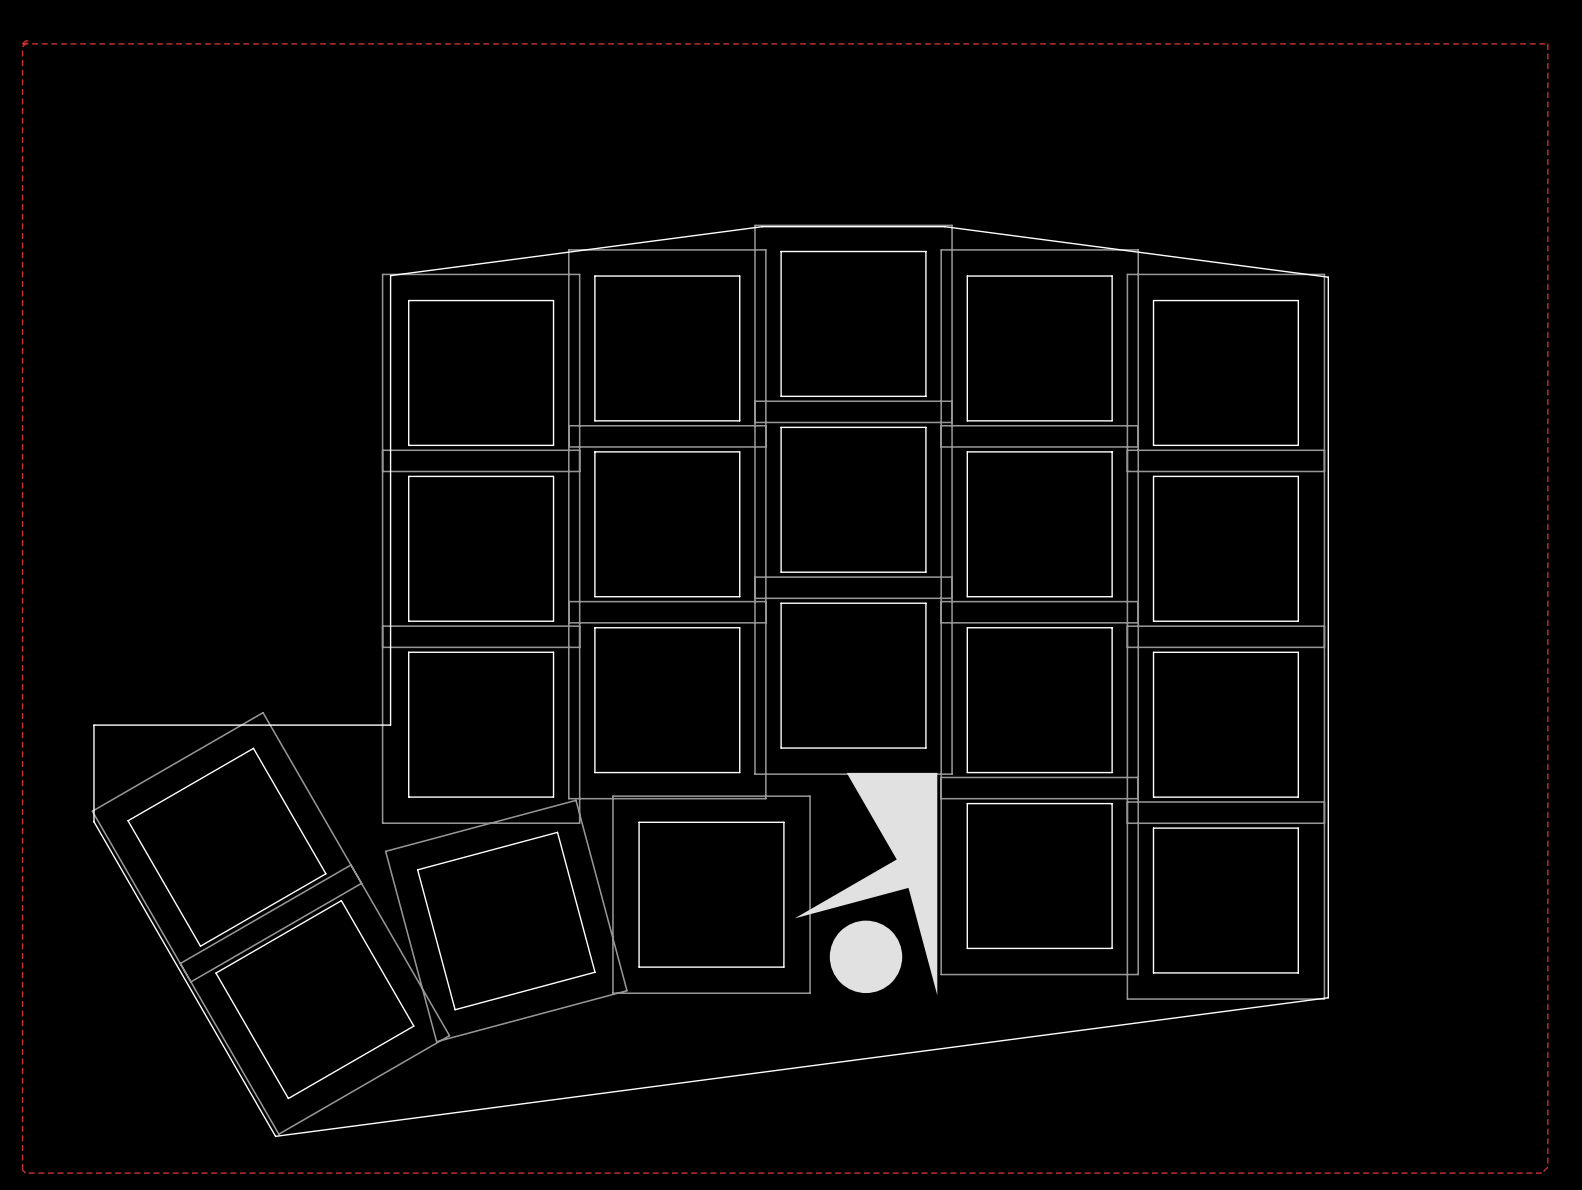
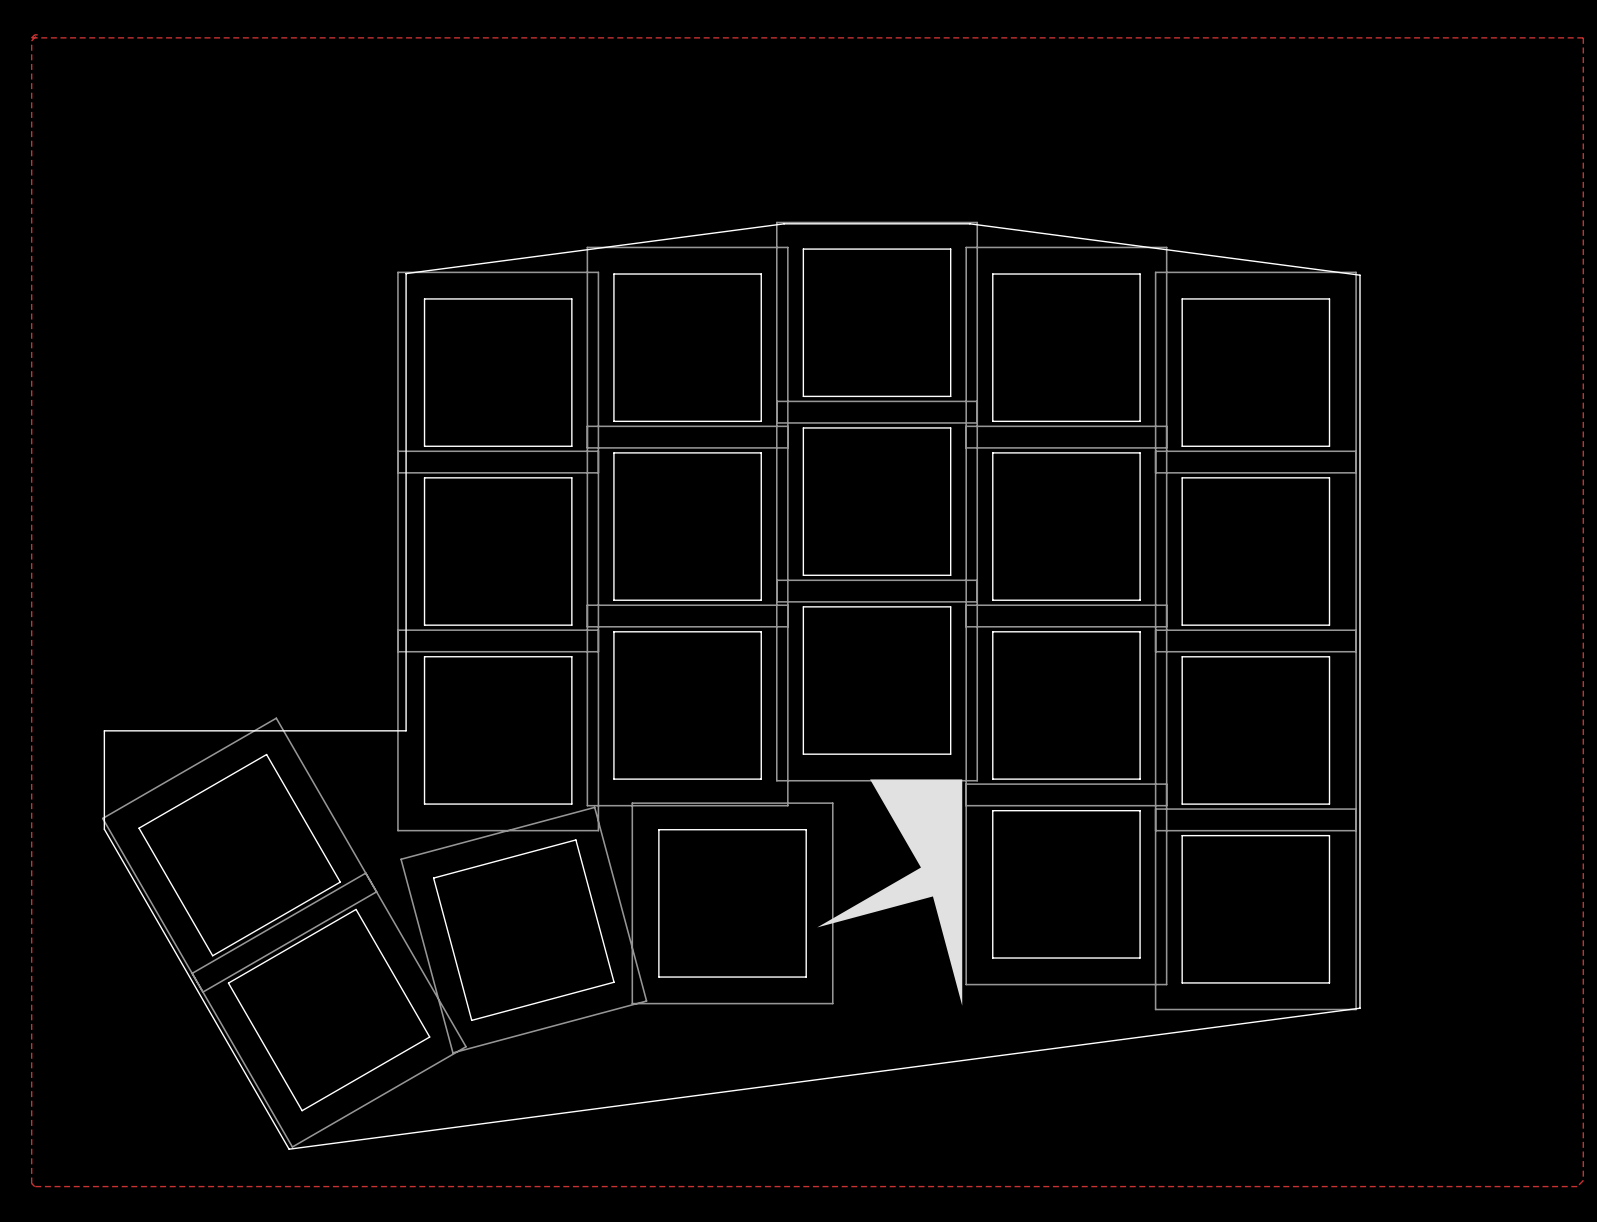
drawing: [829, 920, 903, 994] -> none

